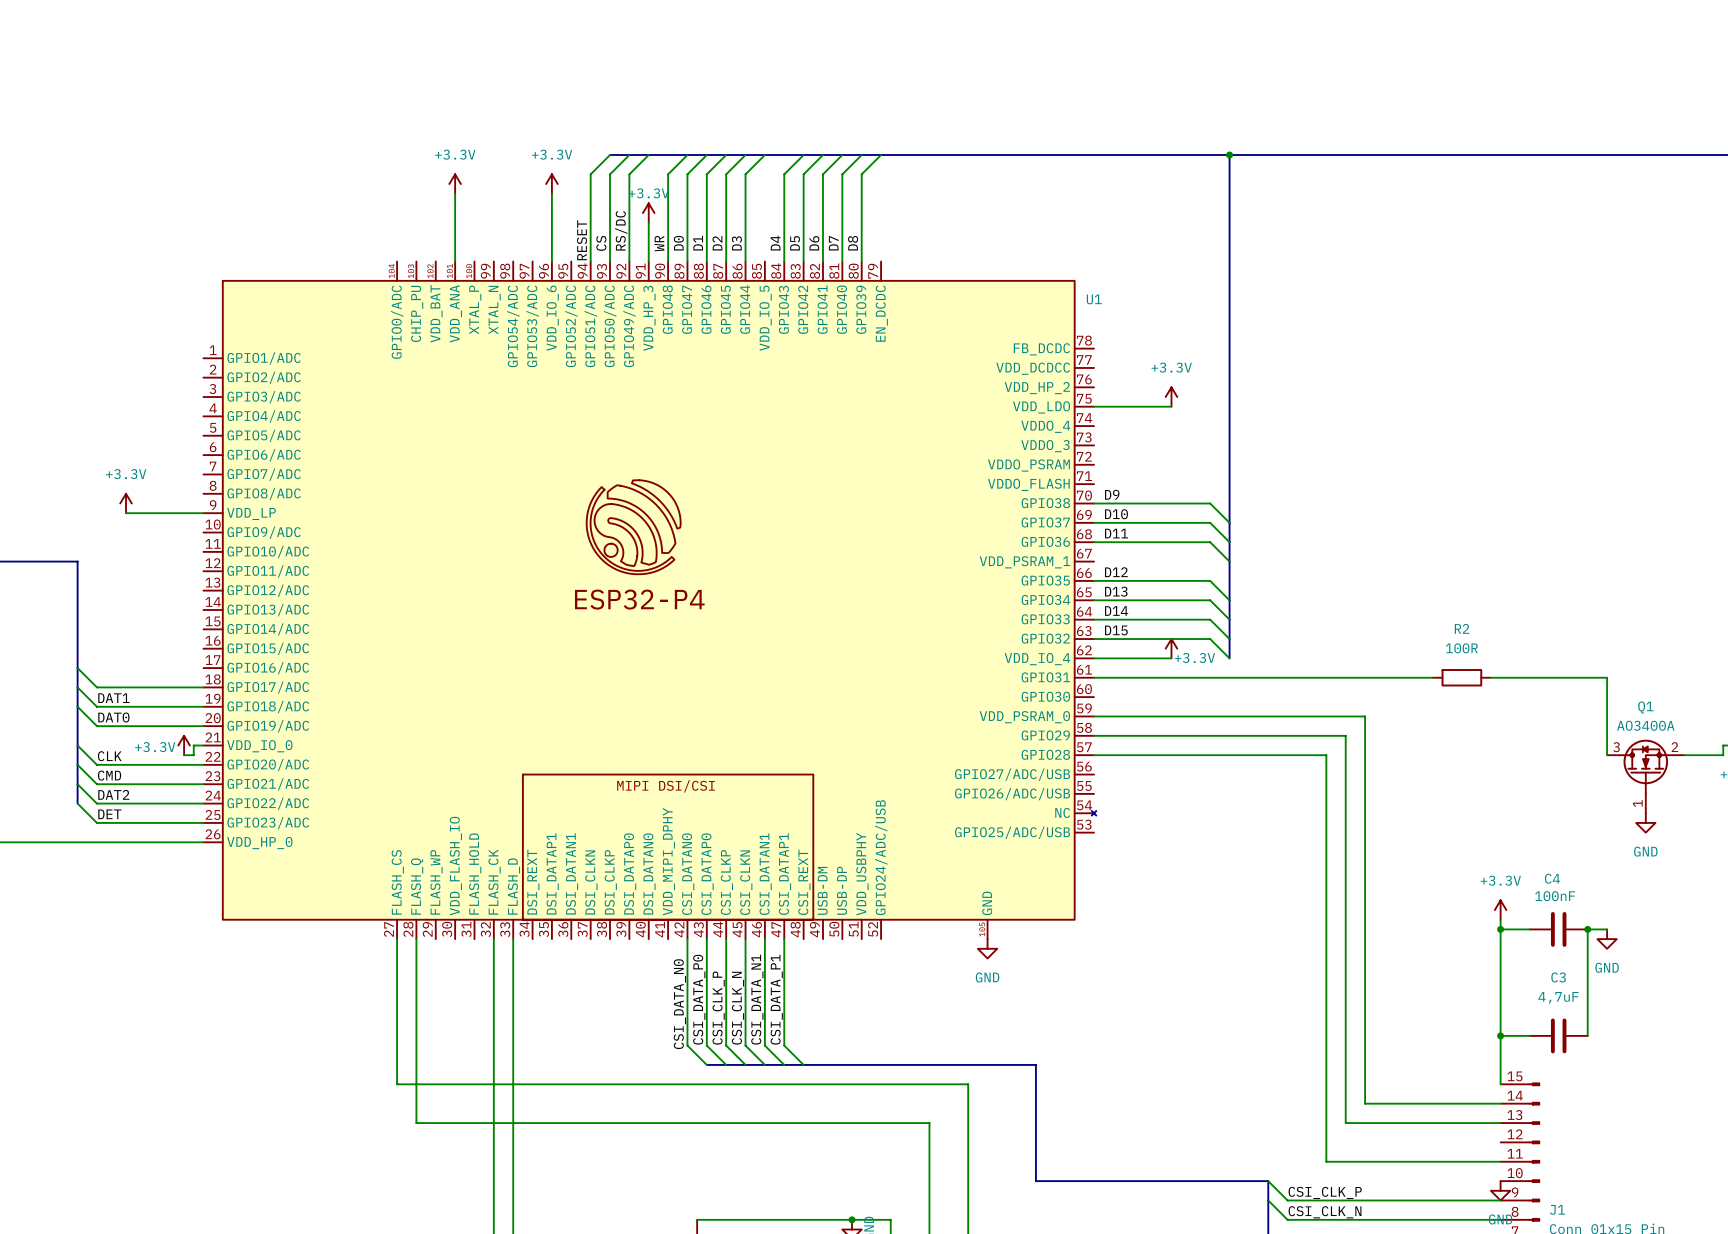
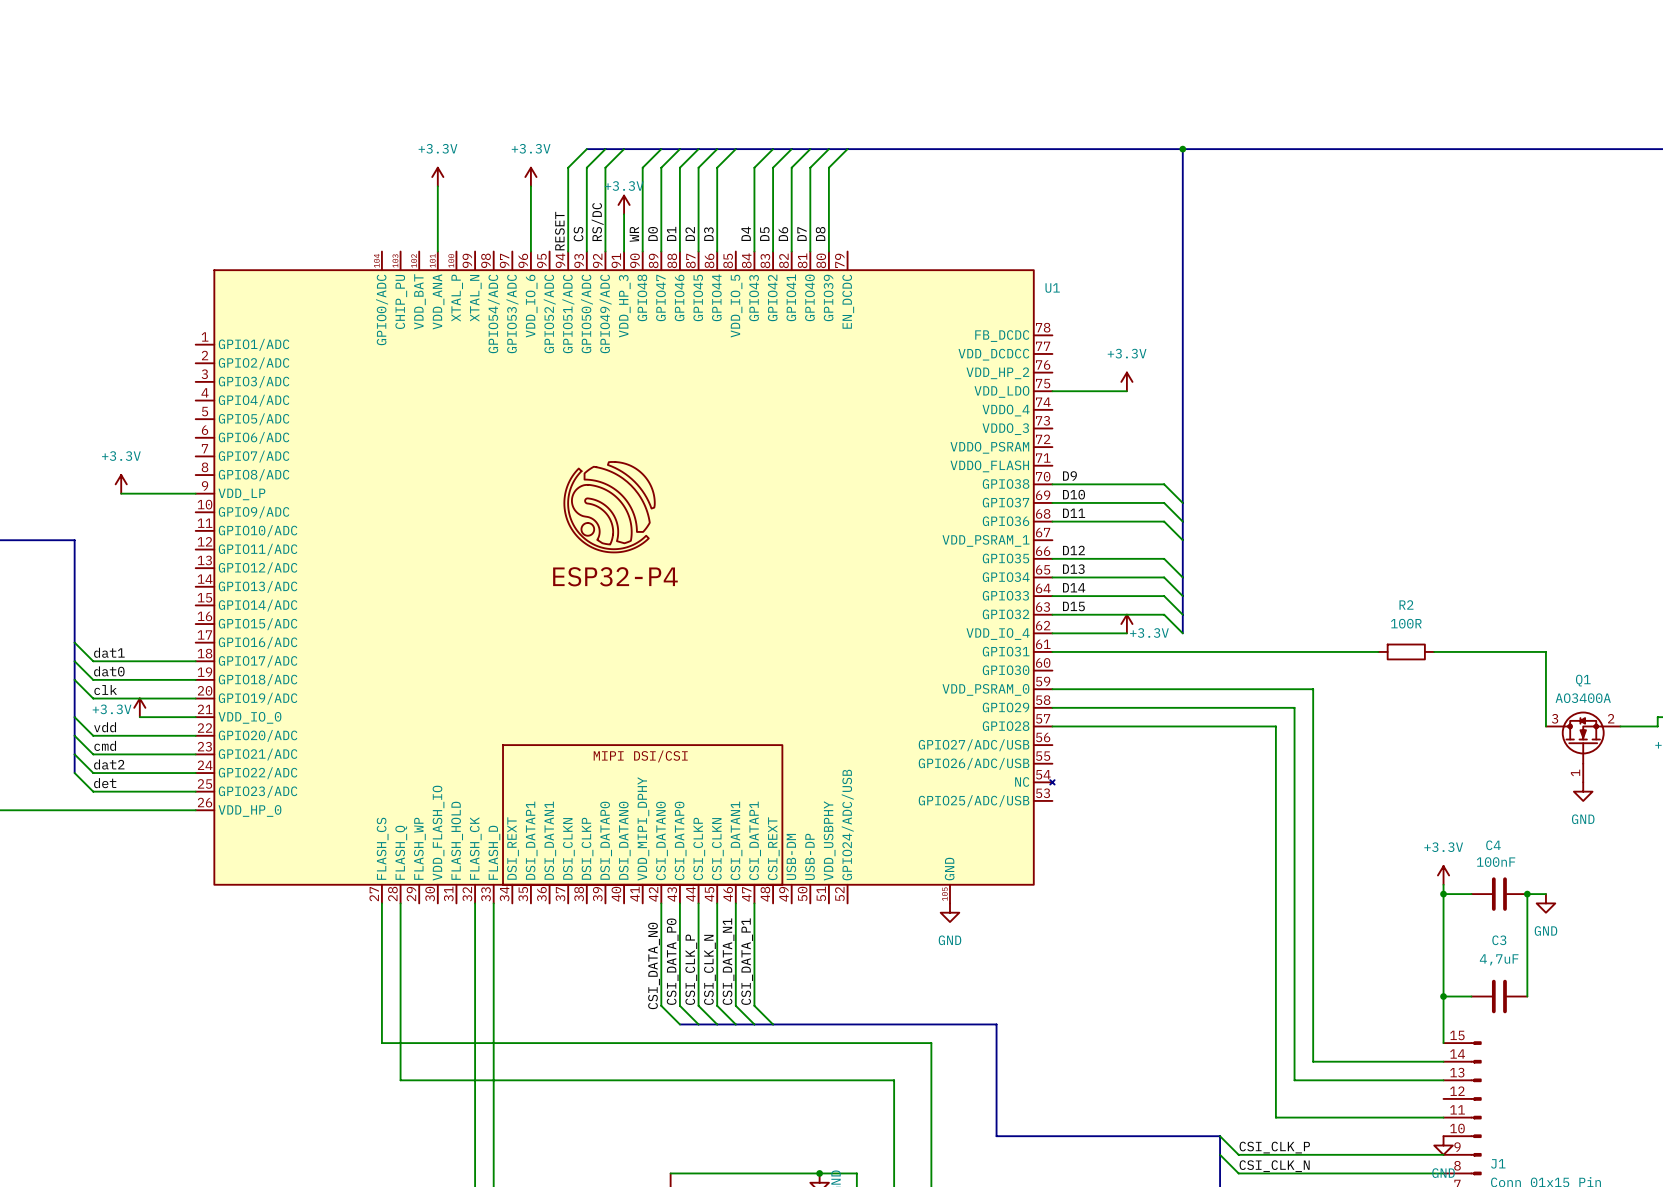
label: none -> dat1 (109, 652)
label: DAT1 (113, 698) -> dat0 (109, 671)
label: DAT0 (113, 717) -> clk (105, 690)
power symbol position: +3.3V (184, 745) -> +3.3V (139, 707)
wire: (193, 745) (193, 755) (184, 755) -> (186, 717) (139, 717)
label: CLK (109, 756) -> vdd (105, 727)
label: CMD (109, 775) -> cmd (105, 745)
label: DAT2 (113, 794) -> dat2 (109, 764)
label: DET (109, 814) -> det (105, 783)

